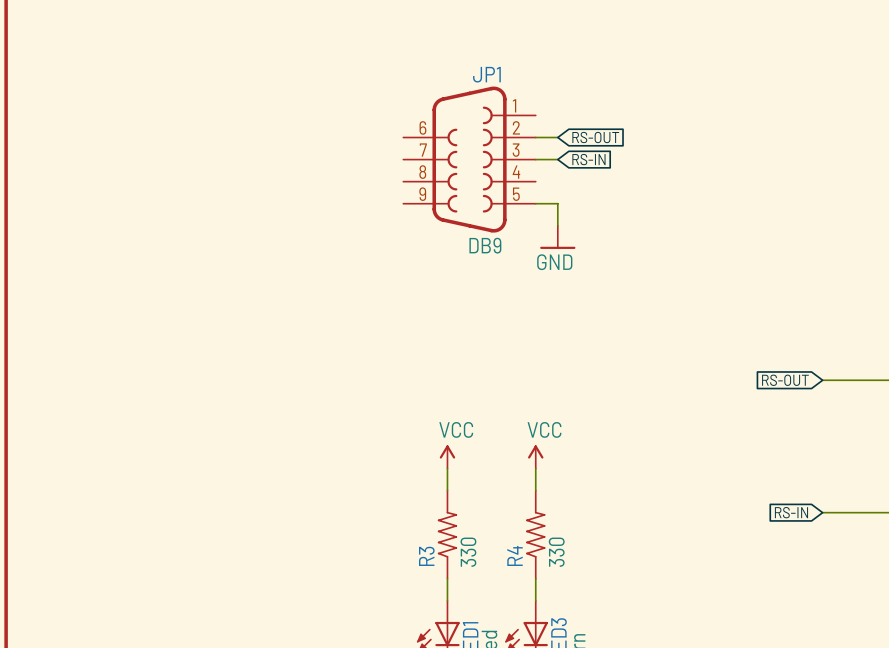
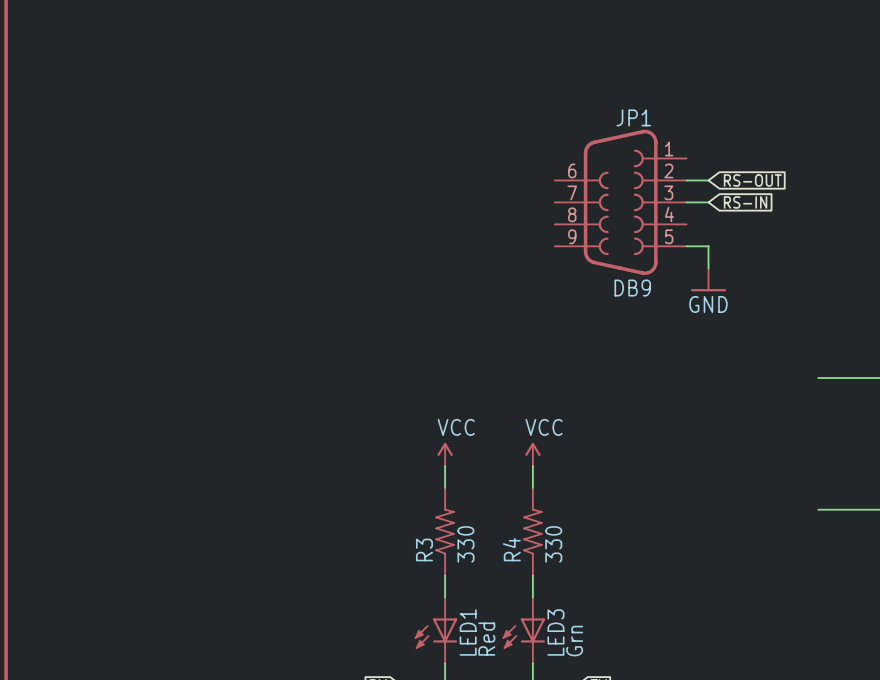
wire: (535, 137) (557, 137) -> (686, 180) (708, 180)
global label: RS-OUT (595, 137) -> none
JP1 position: (469, 159) -> (620, 202)
wire: (535, 159) (557, 159) -> (686, 202) (708, 202)
global label position: RS-IN (588, 159) -> RS-IN (745, 202)
global label: none -> RS-OUT (752, 180)
wire: (535, 203) (557, 203) (557, 225) -> (686, 246) (708, 246) (708, 268)
power symbol position: GND (557, 237) -> GND (708, 279)
global label: RS-OUT (785, 380) -> none
global label: RS-IN (791, 512) -> none

